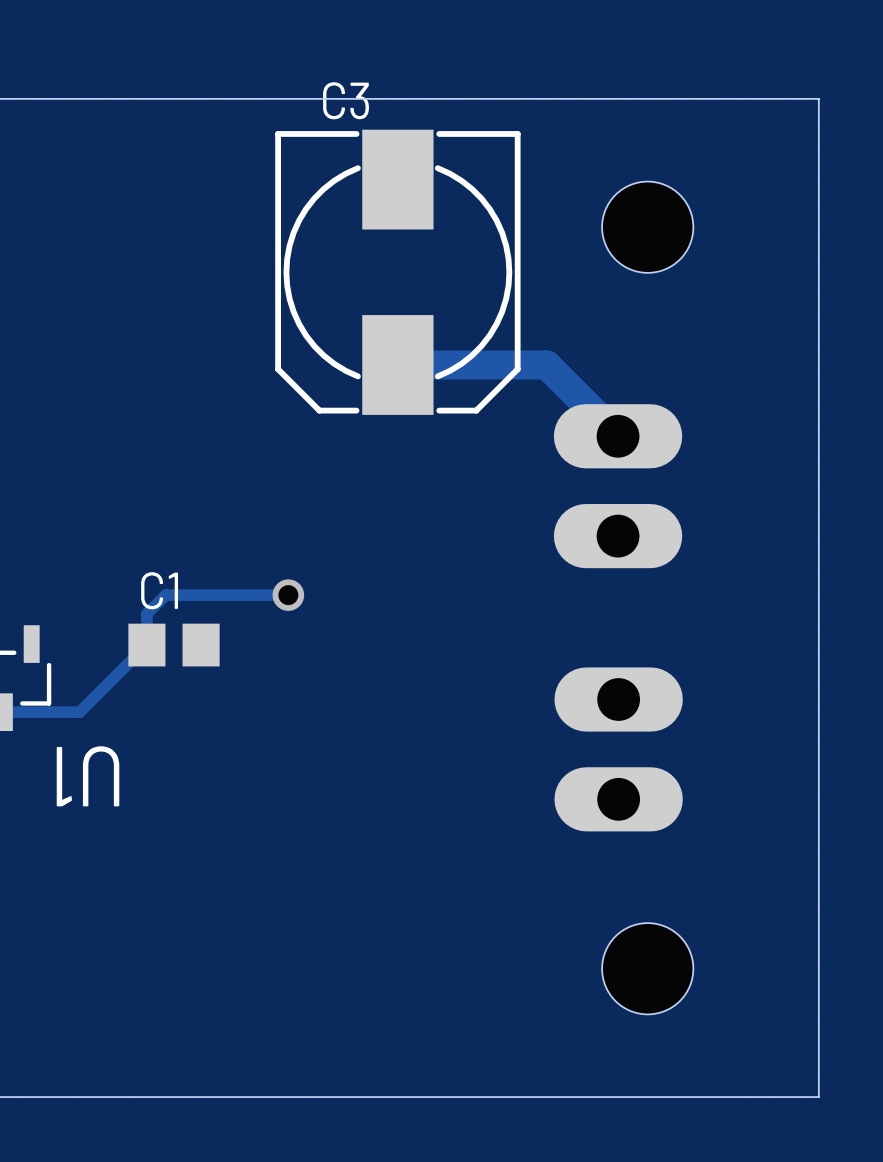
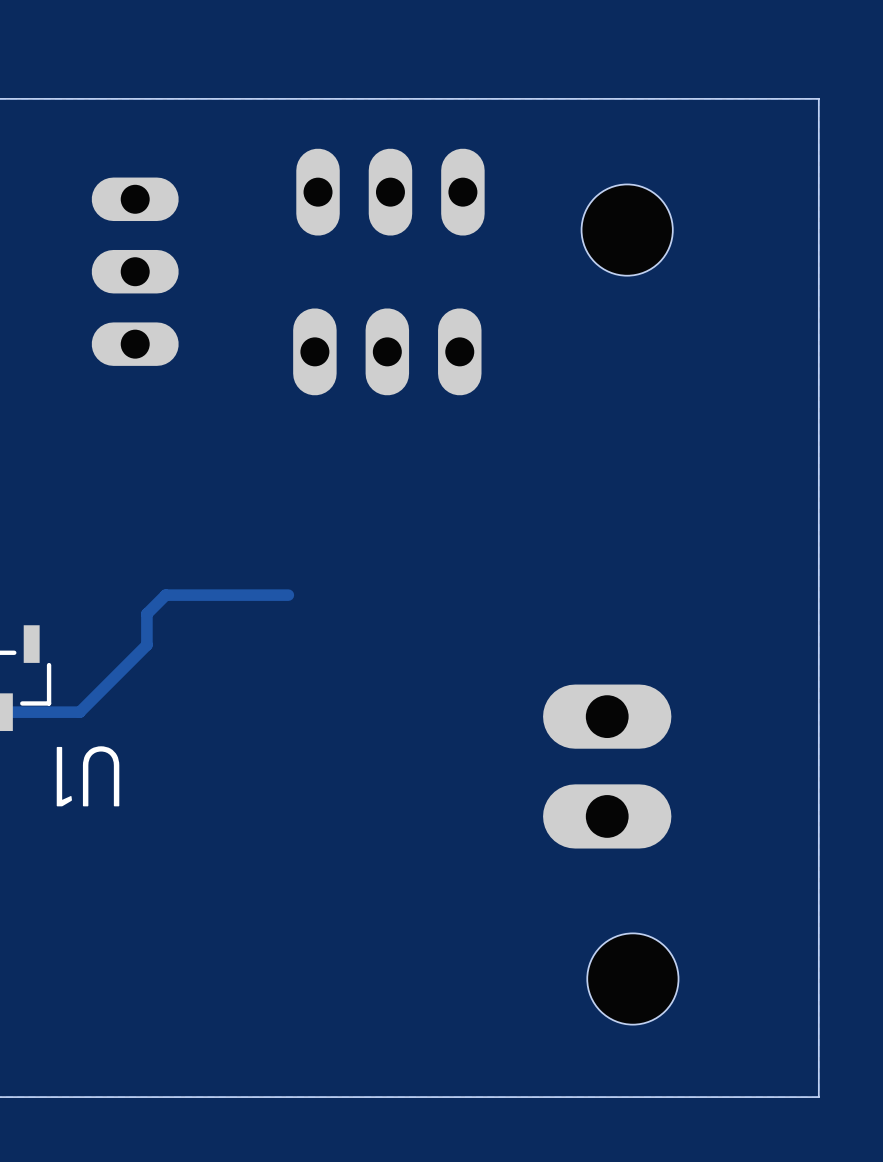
part: none -> (390, 192)
hole position: (647, 227) -> (627, 230)
part: none -> (135, 271)
C3: (397, 272) -> none
part: none -> (387, 351)
track: (397, 364) (546, 364) (618, 436) -> none
part: (618, 486) -> none
via: (288, 595) -> none
C1: (174, 645) -> none
part position: (618, 749) -> (607, 766)
hole position: (647, 968) -> (632, 979)

